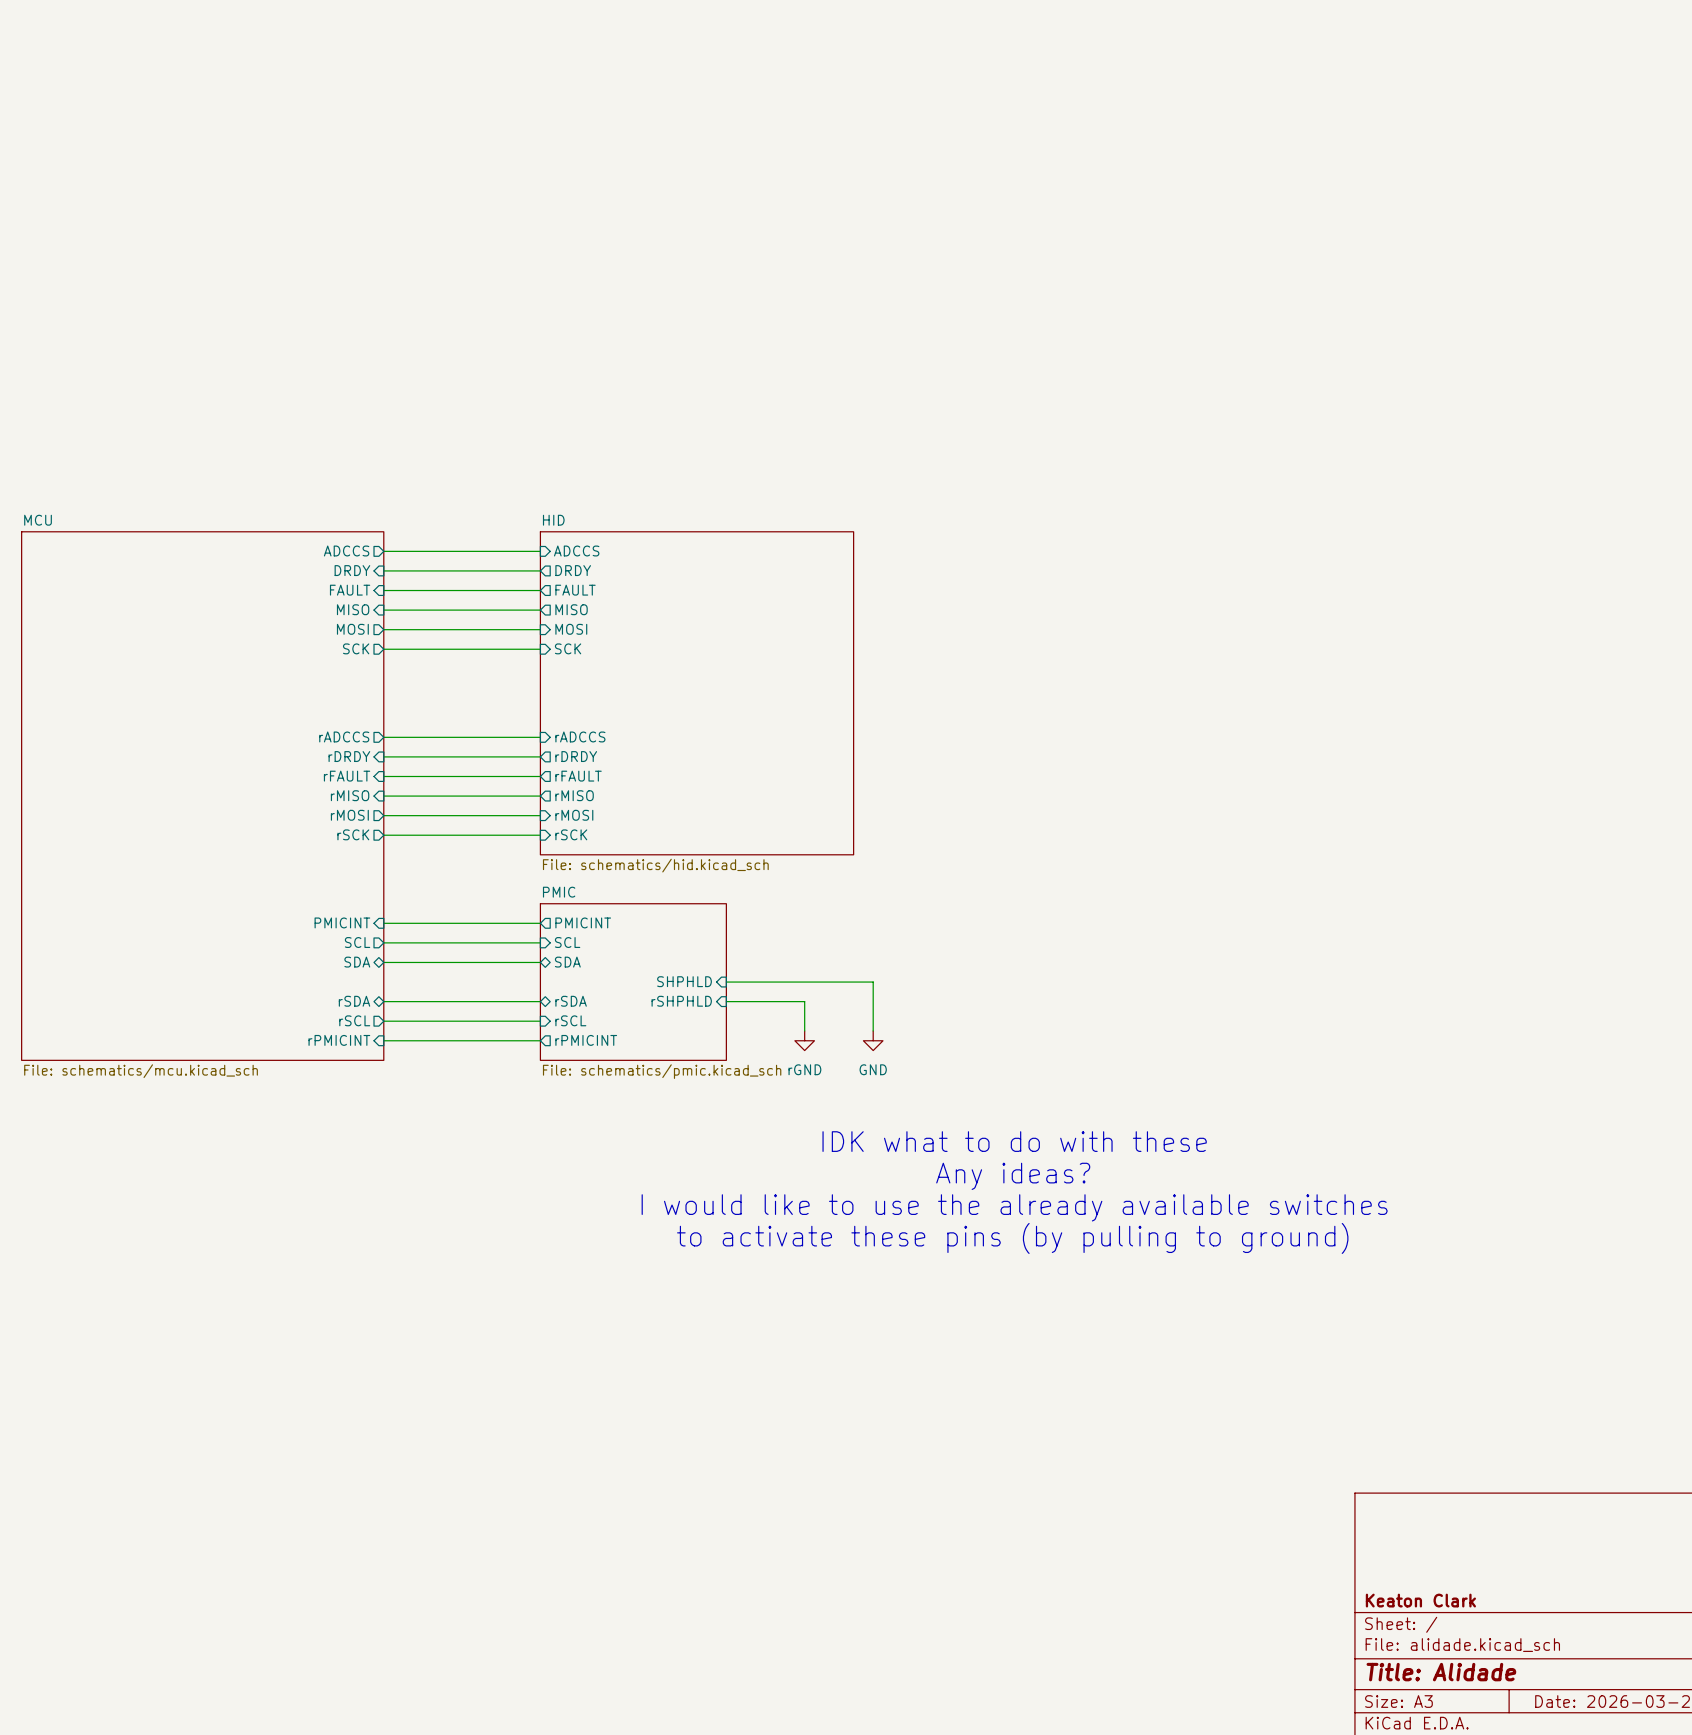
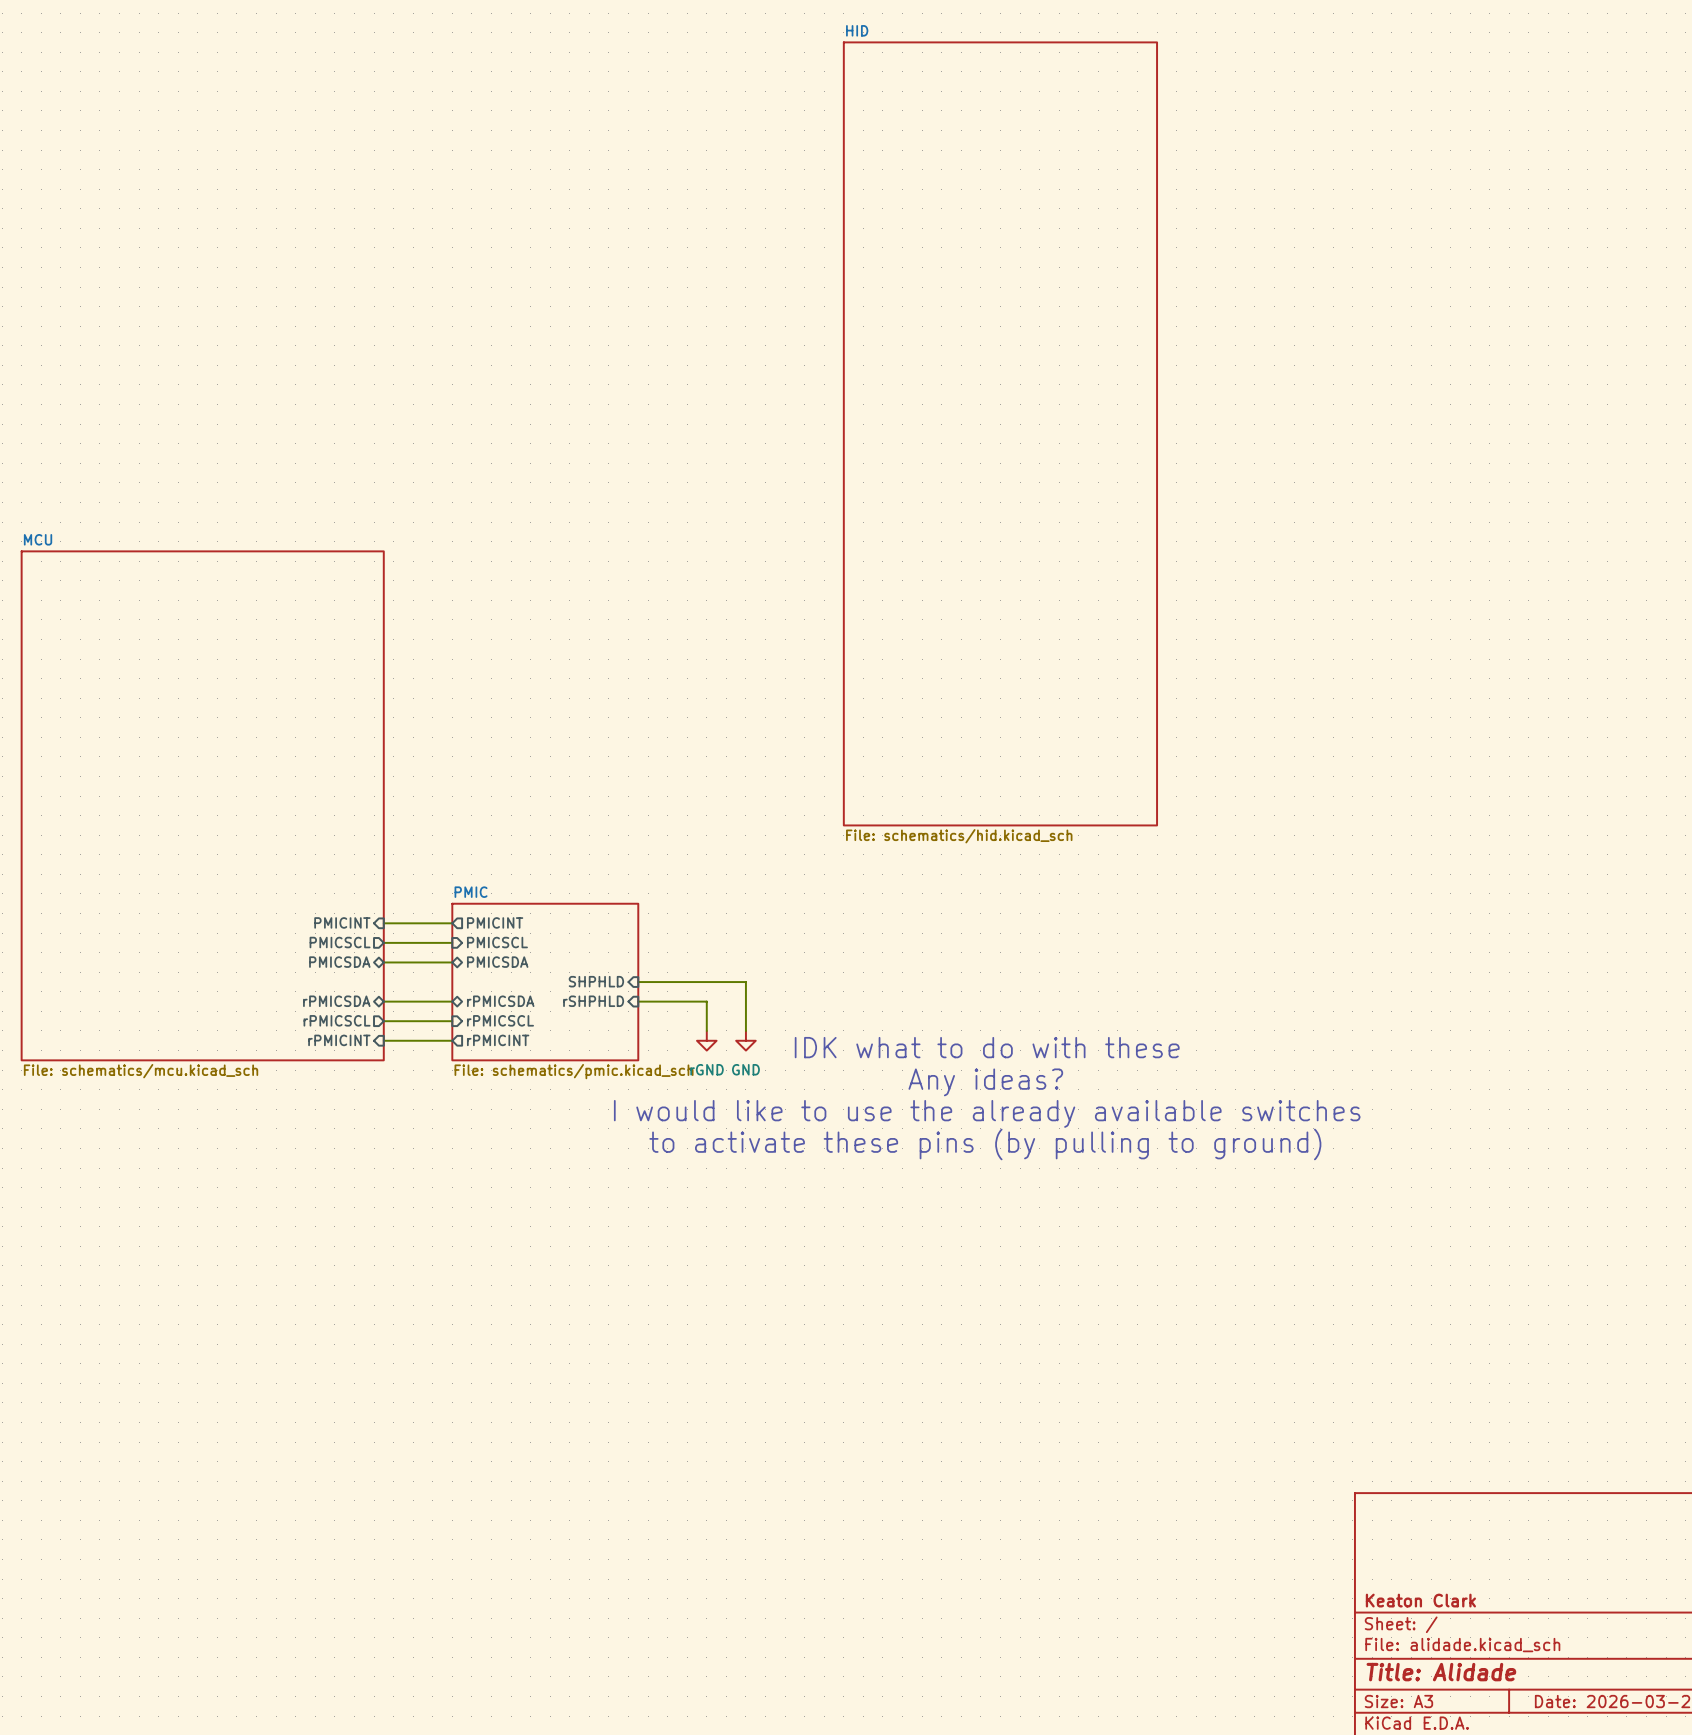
sheet HID: none -> File: schematics/hid.kicad_sch (1000, 433)
sheet pin: ADCCS (346, 551) -> none
wire: (383, 551) (540, 551) -> none
sheet pin: ADCCS (576, 551) -> none
sheet pin: DRDY (352, 570) -> none
wire: (383, 570) (540, 570) -> none
sheet pin: DRDY (573, 570) -> none
sheet pin: FAULT (350, 590) -> none
wire: (383, 590) (540, 590) -> none
sheet pin: FAULT (575, 590) -> none
sheet pin: MISO (353, 609) -> none
sheet pin: MISO (571, 609) -> none
wire: (383, 610) (540, 610) -> none
sheet pin: MOSI (352, 629) -> none
wire: (383, 629) (540, 629) -> none
sheet pin: MOSI (571, 629) -> none
sheet pin: SCK (356, 648) -> none
sheet pin: SCK (568, 648) -> none
wire: (383, 649) (540, 649) -> none
sheet HID: File: schematics/hid.kicad_sch (697, 693) -> none
sheet pin: rADCCS (344, 736) -> none
sheet pin: rADCCS (580, 736) -> none
wire: (383, 737) (540, 737) -> none
sheet pin: rDRDY (349, 756) -> none
wire: (383, 756) (540, 756) -> none
sheet pin: rDRDY (576, 756) -> none
sheet pin: rFAULT (347, 776) -> none
wire: (383, 776) (540, 776) -> none
sheet pin: rFAULT (578, 776) -> none
sheet pin: rMISO (350, 795) -> none
sheet pin: rMISO (574, 795) -> none
sheet MCU: File: schematics/mcu.kicad_sch (202, 796) -> none
wire: (383, 796) (540, 796) -> none
sheet MCU: none -> File: schematics/mcu.kicad_sch (202, 805)
sheet pin: rMOSI (349, 815) -> none
wire: (383, 815) (540, 815) -> none
sheet pin: rMOSI (574, 815) -> none
sheet pin: rSCK (353, 834) -> none
sheet pin: rSCK (571, 834) -> none
wire: (383, 835) (540, 835) -> none
sheet pin position: PMICINT (583, 922) -> PMICINT (495, 922)
wire: (452, 923) (540, 923) -> none
sheet pin: SCL (357, 942) -> PMICSCL (340, 942)
wire: (452, 942) (540, 942) -> none
sheet pin: none -> PMICSCL (497, 942)
sheet pin: SCL (567, 942) -> none
sheet pin: SDA (357, 962) -> PMICSDA (339, 962)
wire: (452, 962) (540, 962) -> (638, 982) (726, 982)
sheet pin: none -> PMICSDA (497, 962)
sheet pin: SDA (567, 962) -> none
sheet pin position: SHPHLD (684, 981) -> SHPHLD (596, 981)
sheet PMIC position: (633, 982) -> (545, 982)
wire: (745, 982) (873, 982) (873, 1030) -> (745, 982) (745, 1030)
sheet pin: rSDA (354, 1001) -> rPMICSDA (336, 1001)
wire: (452, 1001) (540, 1001) -> none
sheet pin: none -> rPMICSDA (500, 1001)
sheet pin: rSDA (571, 1001) -> none
wire: none -> (638, 1001) (706, 1001) (706, 1030)
sheet pin position: rSHPHLD (681, 1001) -> rSHPHLD (593, 1001)
wire: (726, 1001) (804, 1001) (804, 1030) -> none
sheet pin: rSCL (354, 1020) -> rPMICSCL (337, 1020)
sheet pin: none -> rPMICSCL (500, 1020)
sheet pin: rSCL (570, 1020) -> none
wire: (452, 1021) (540, 1021) -> none
wire: (452, 1040) (540, 1040) -> none
sheet pin position: rPMICINT (586, 1040) -> rPMICINT (498, 1040)
power symbol position: rGND (804, 1040) -> rGND (706, 1040)
power symbol position: GND (873, 1040) -> GND (745, 1040)
text position: IDK what to do with these (1014, 1141) -> IDK what to do with these (987, 1047)
text position: Any ideas? (1013, 1176) -> Any ideas? (985, 1082)
text position: I would like to use the already available switches (1014, 1207) -> I would like to use the already available switches (987, 1113)
text position: to activate these pins (by pulling to ground) (1012, 1238) -> to activate these pins (by pulling to ground) (985, 1144)

